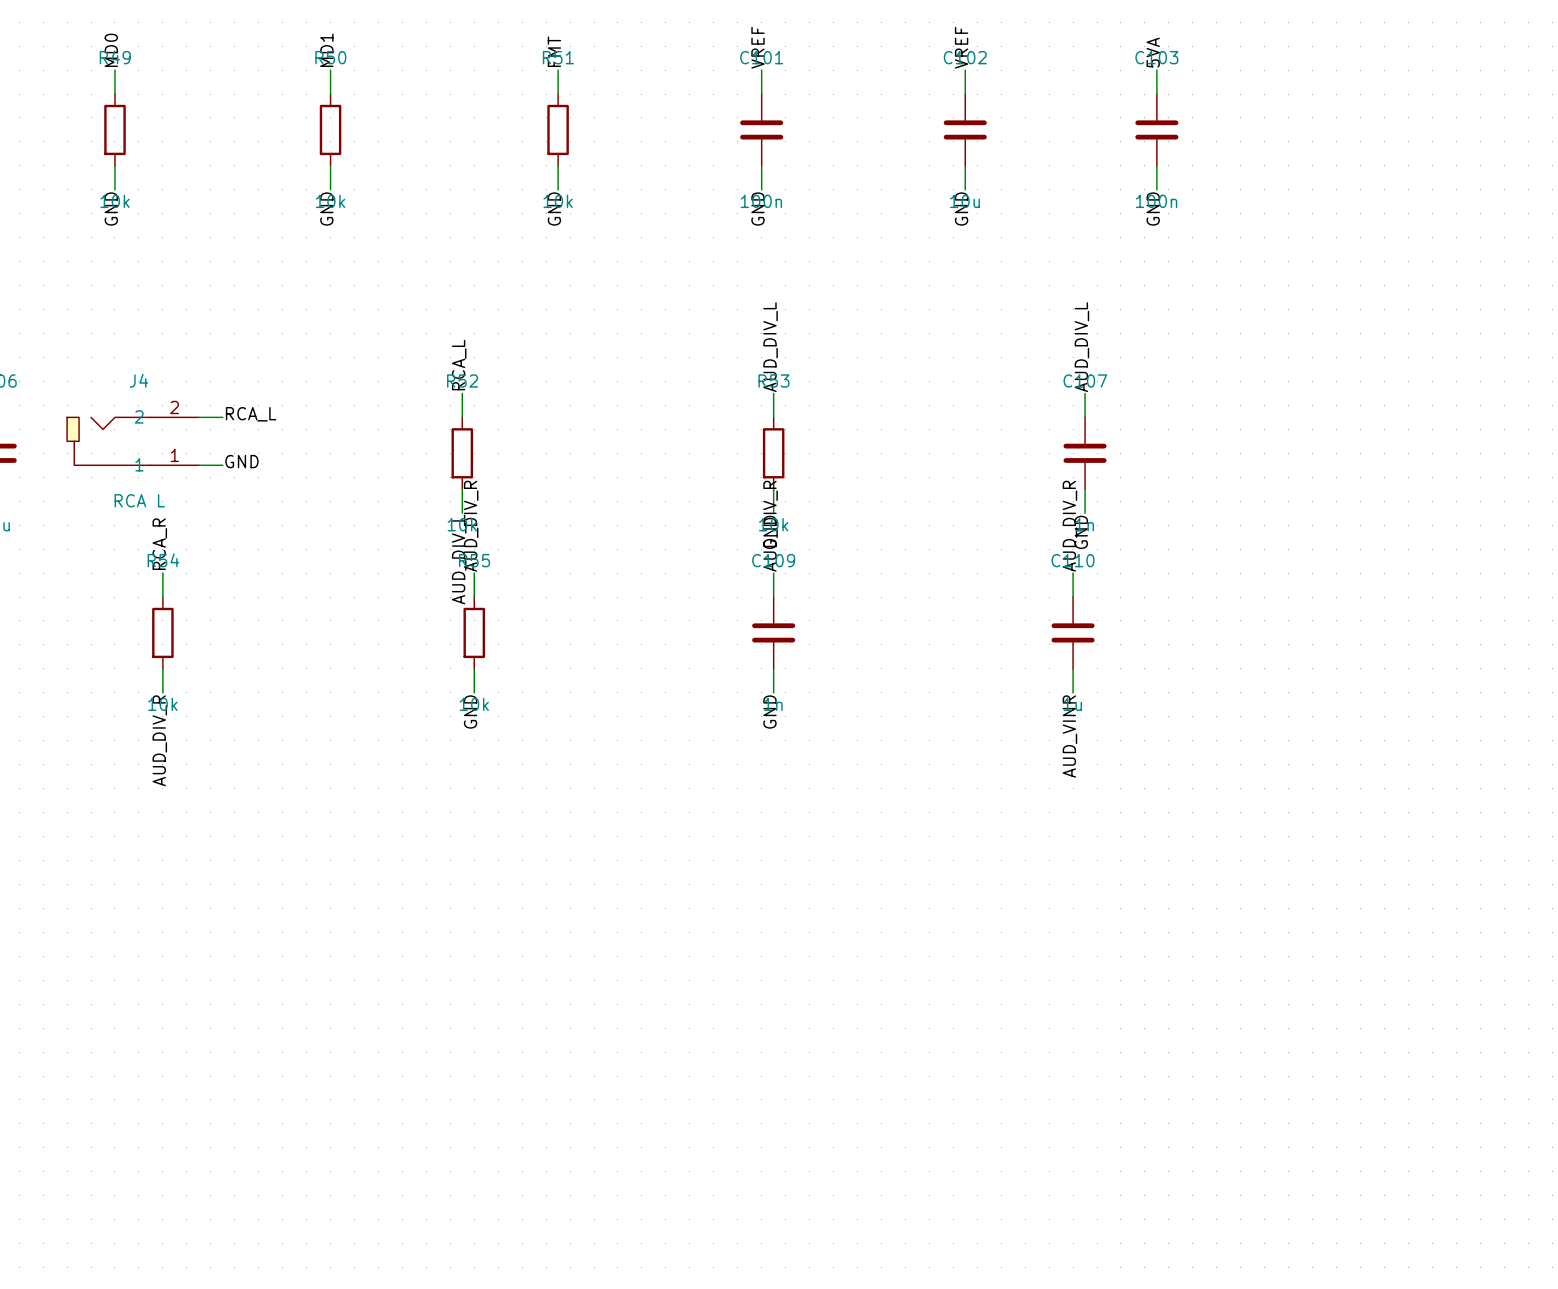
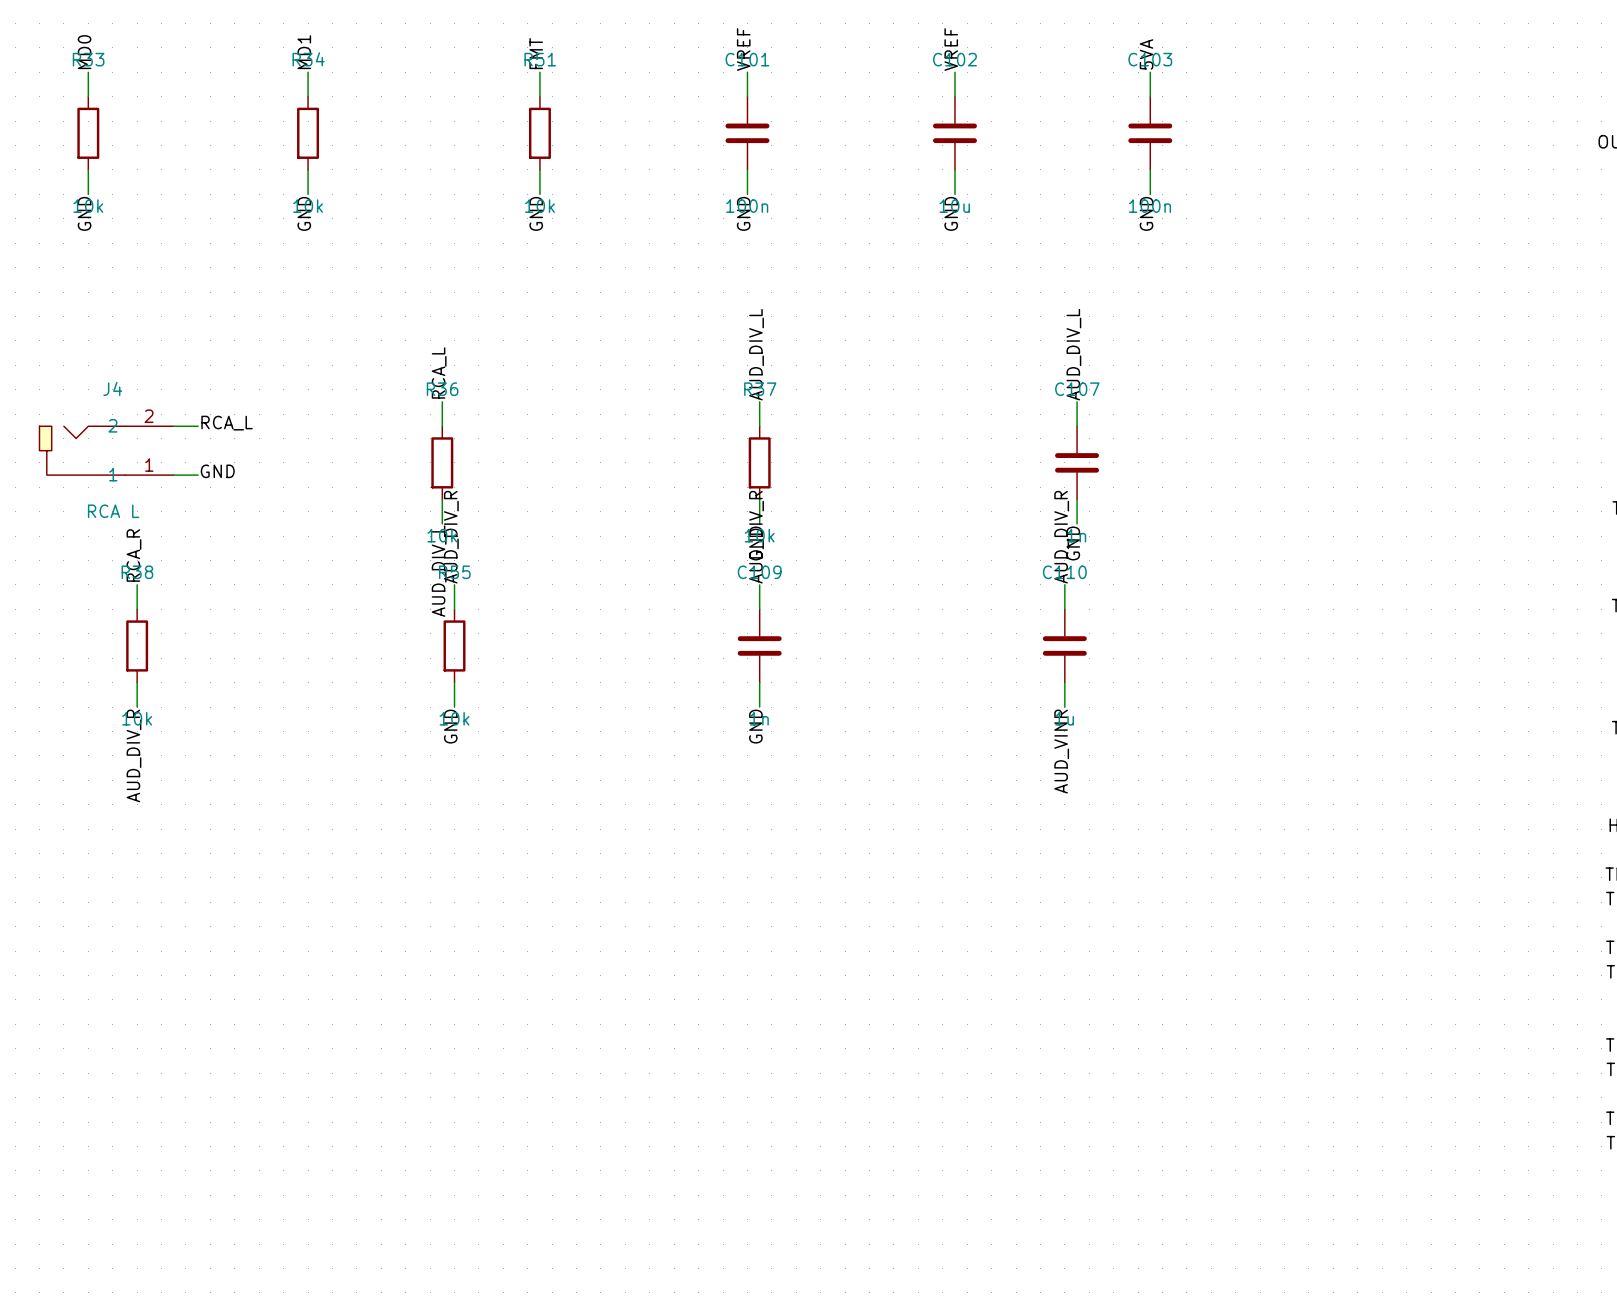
R49 name: R49 (115, 57) -> R33 (88, 59)
R50 name: R50 (330, 57) -> R34 (308, 59)
R52 name: R52 (462, 381) -> R36 (442, 389)
R53 name: R53 (773, 381) -> R37 (760, 389)
R54 name: R54 (163, 560) -> R38 (137, 572)

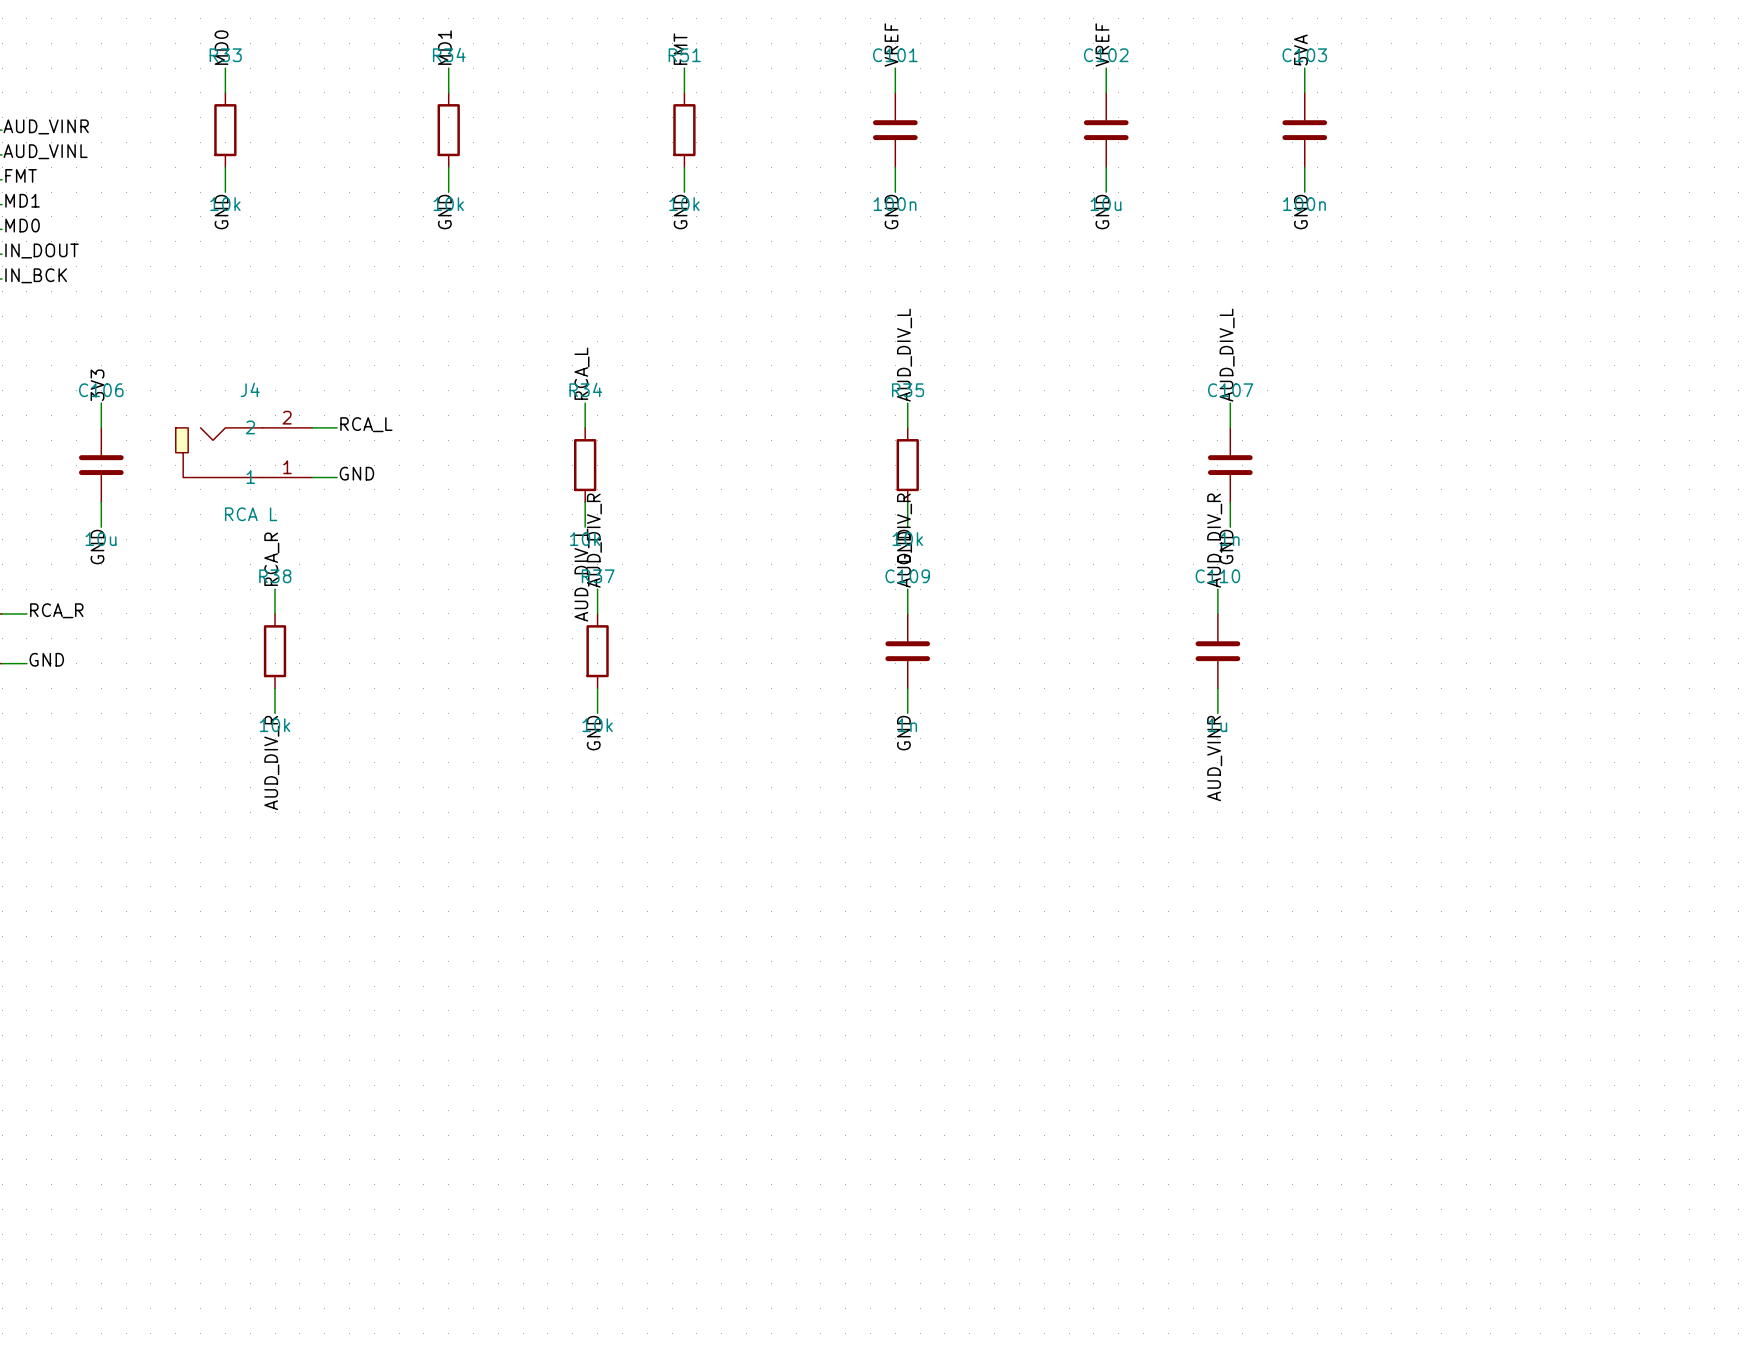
R36 name: R36 (442, 389) -> R34 (585, 389)
R37 name: R37 (760, 389) -> R35 (908, 390)
R55 name: R55 (454, 572) -> R37 (598, 576)

